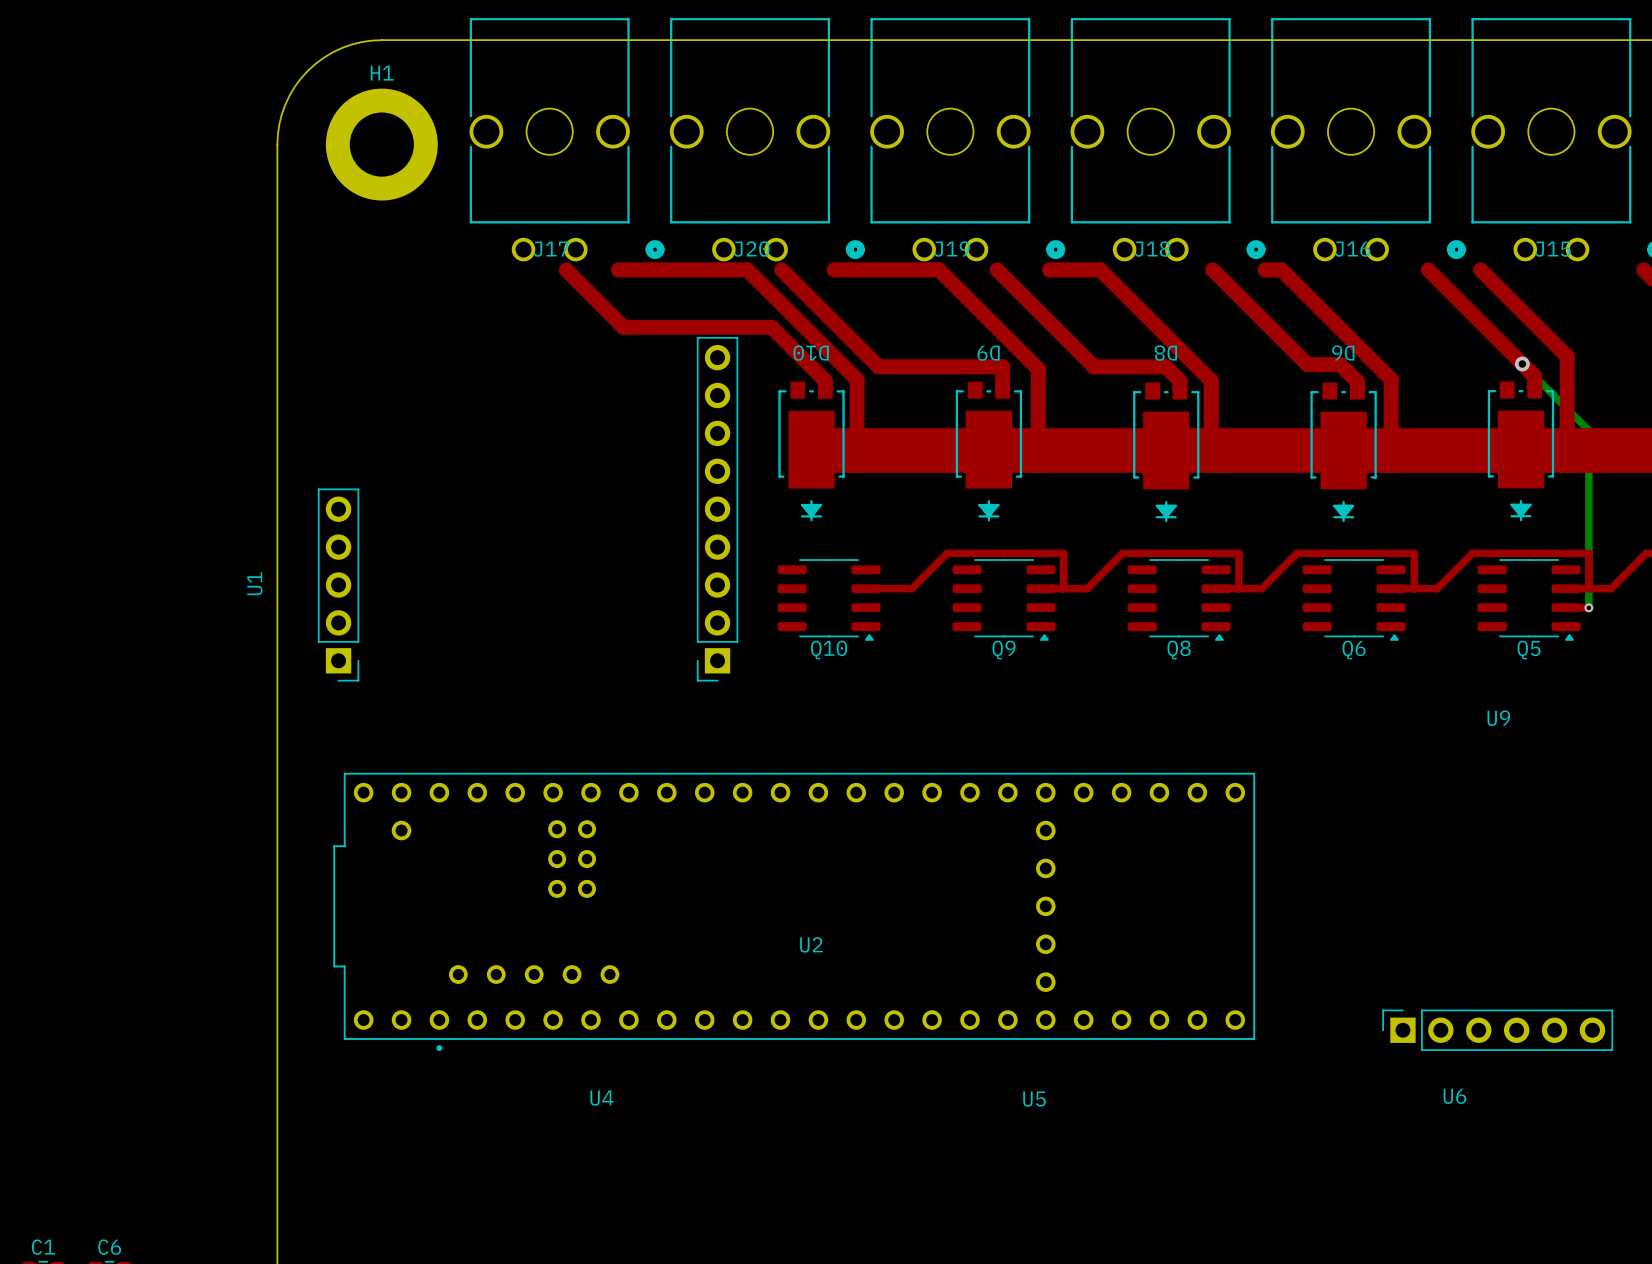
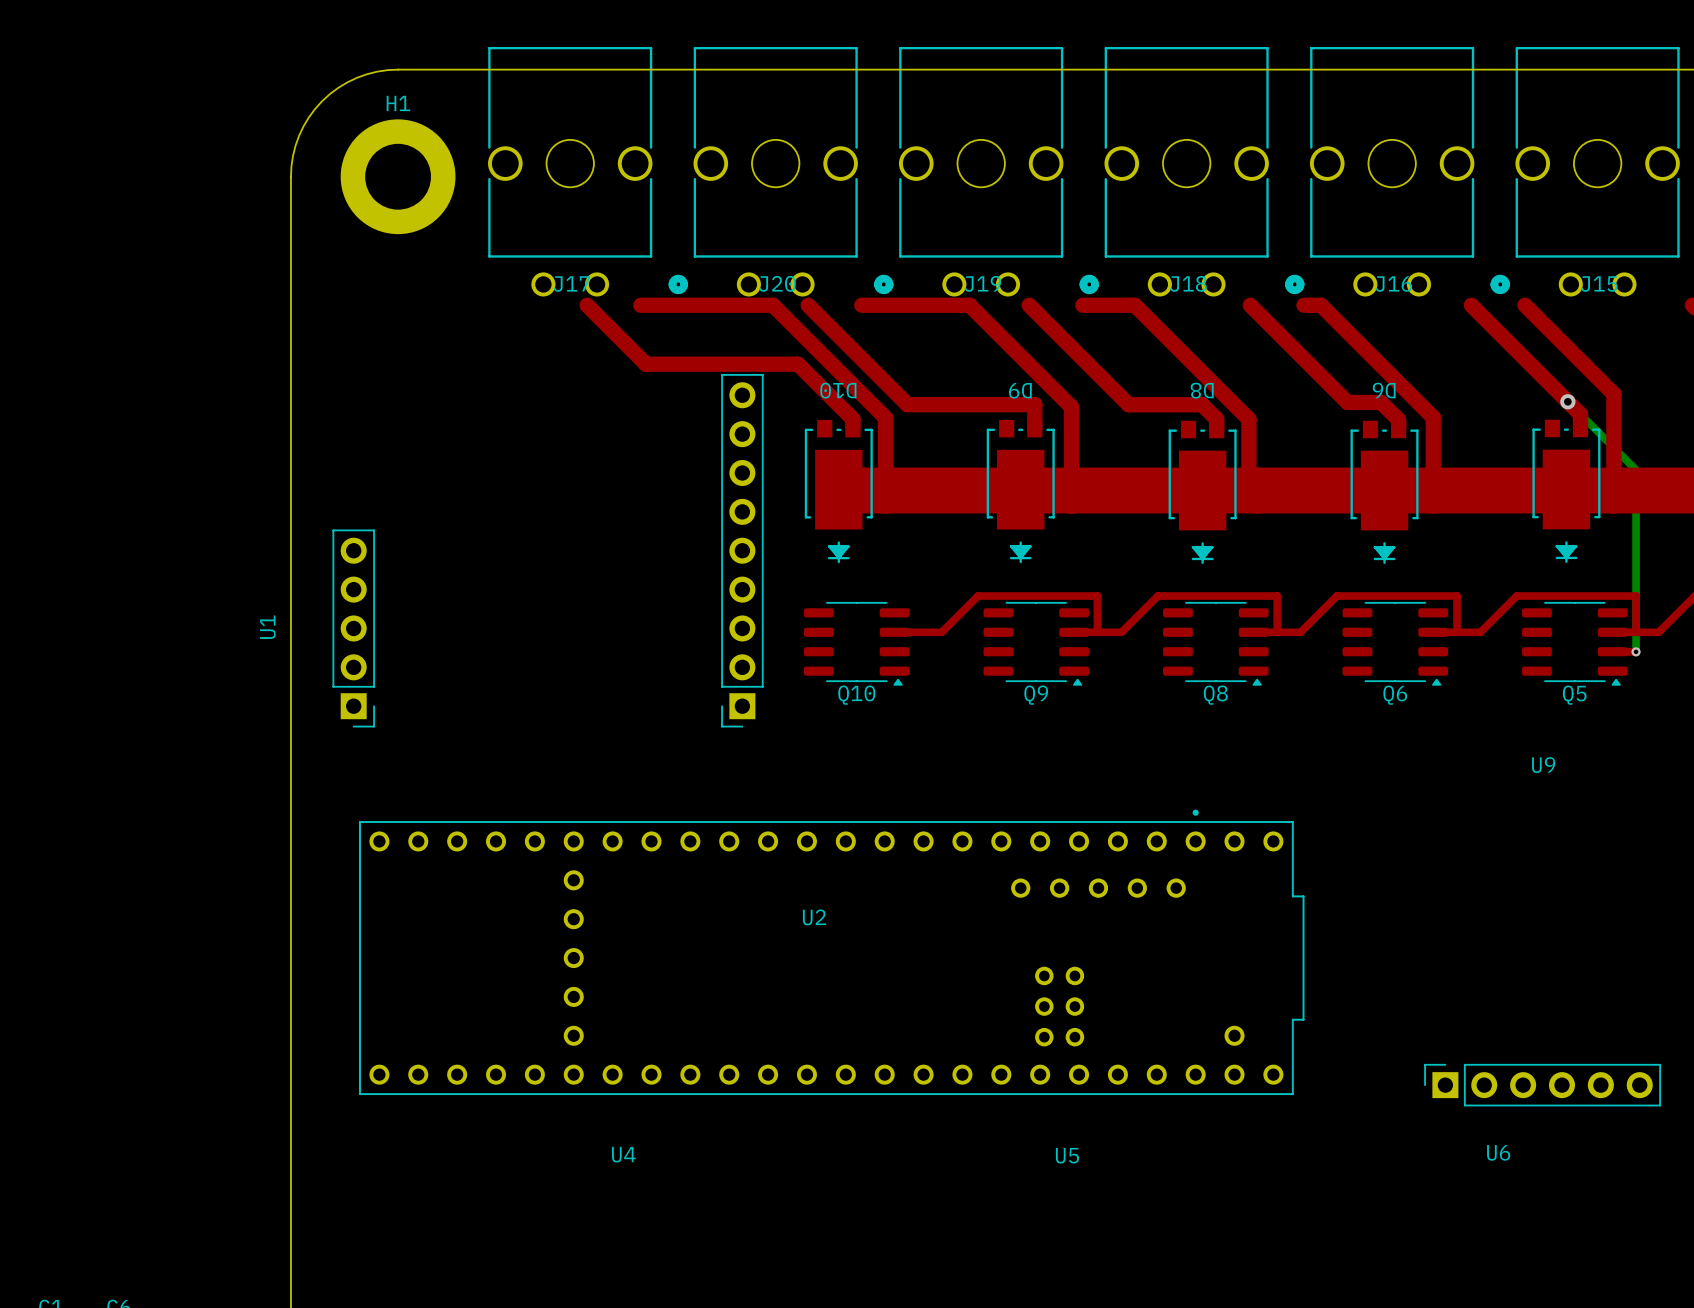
U2 rotation: 0° (794, 911) -> 180° (831, 952)

